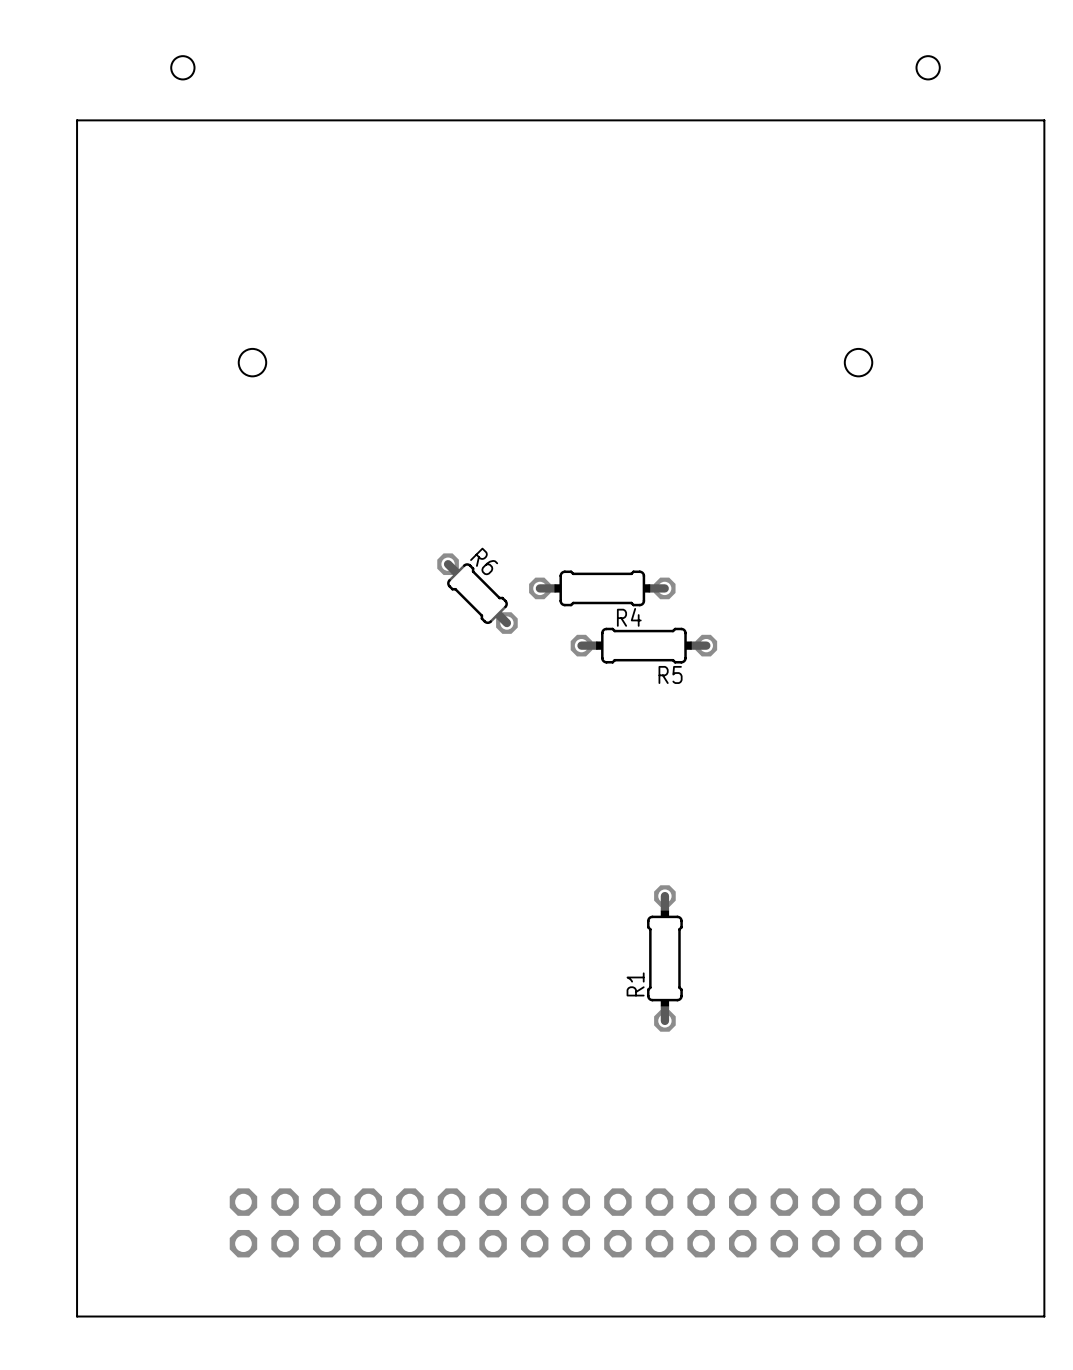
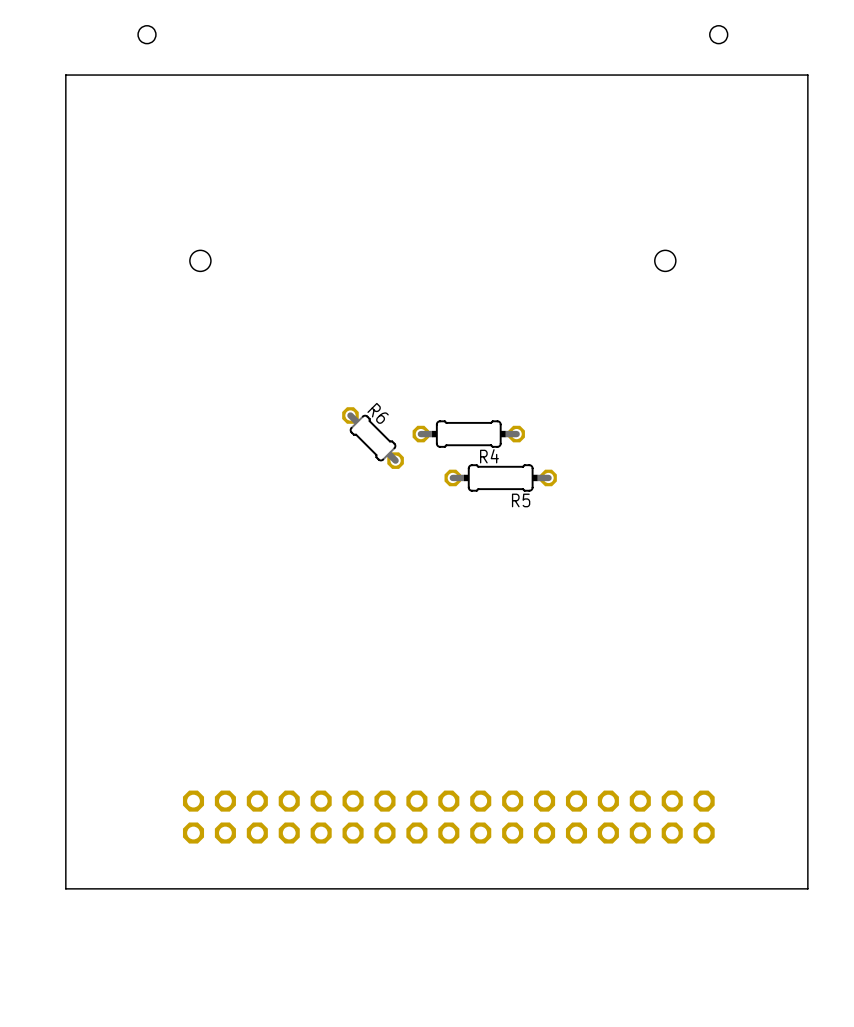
R1: (664, 958) -> none
board edge: (1044, 1181) (1044, 1316) (77, 1316) (77, 1181) -> (807, 888) (65, 888)
part position: (576, 1222) -> (448, 817)

